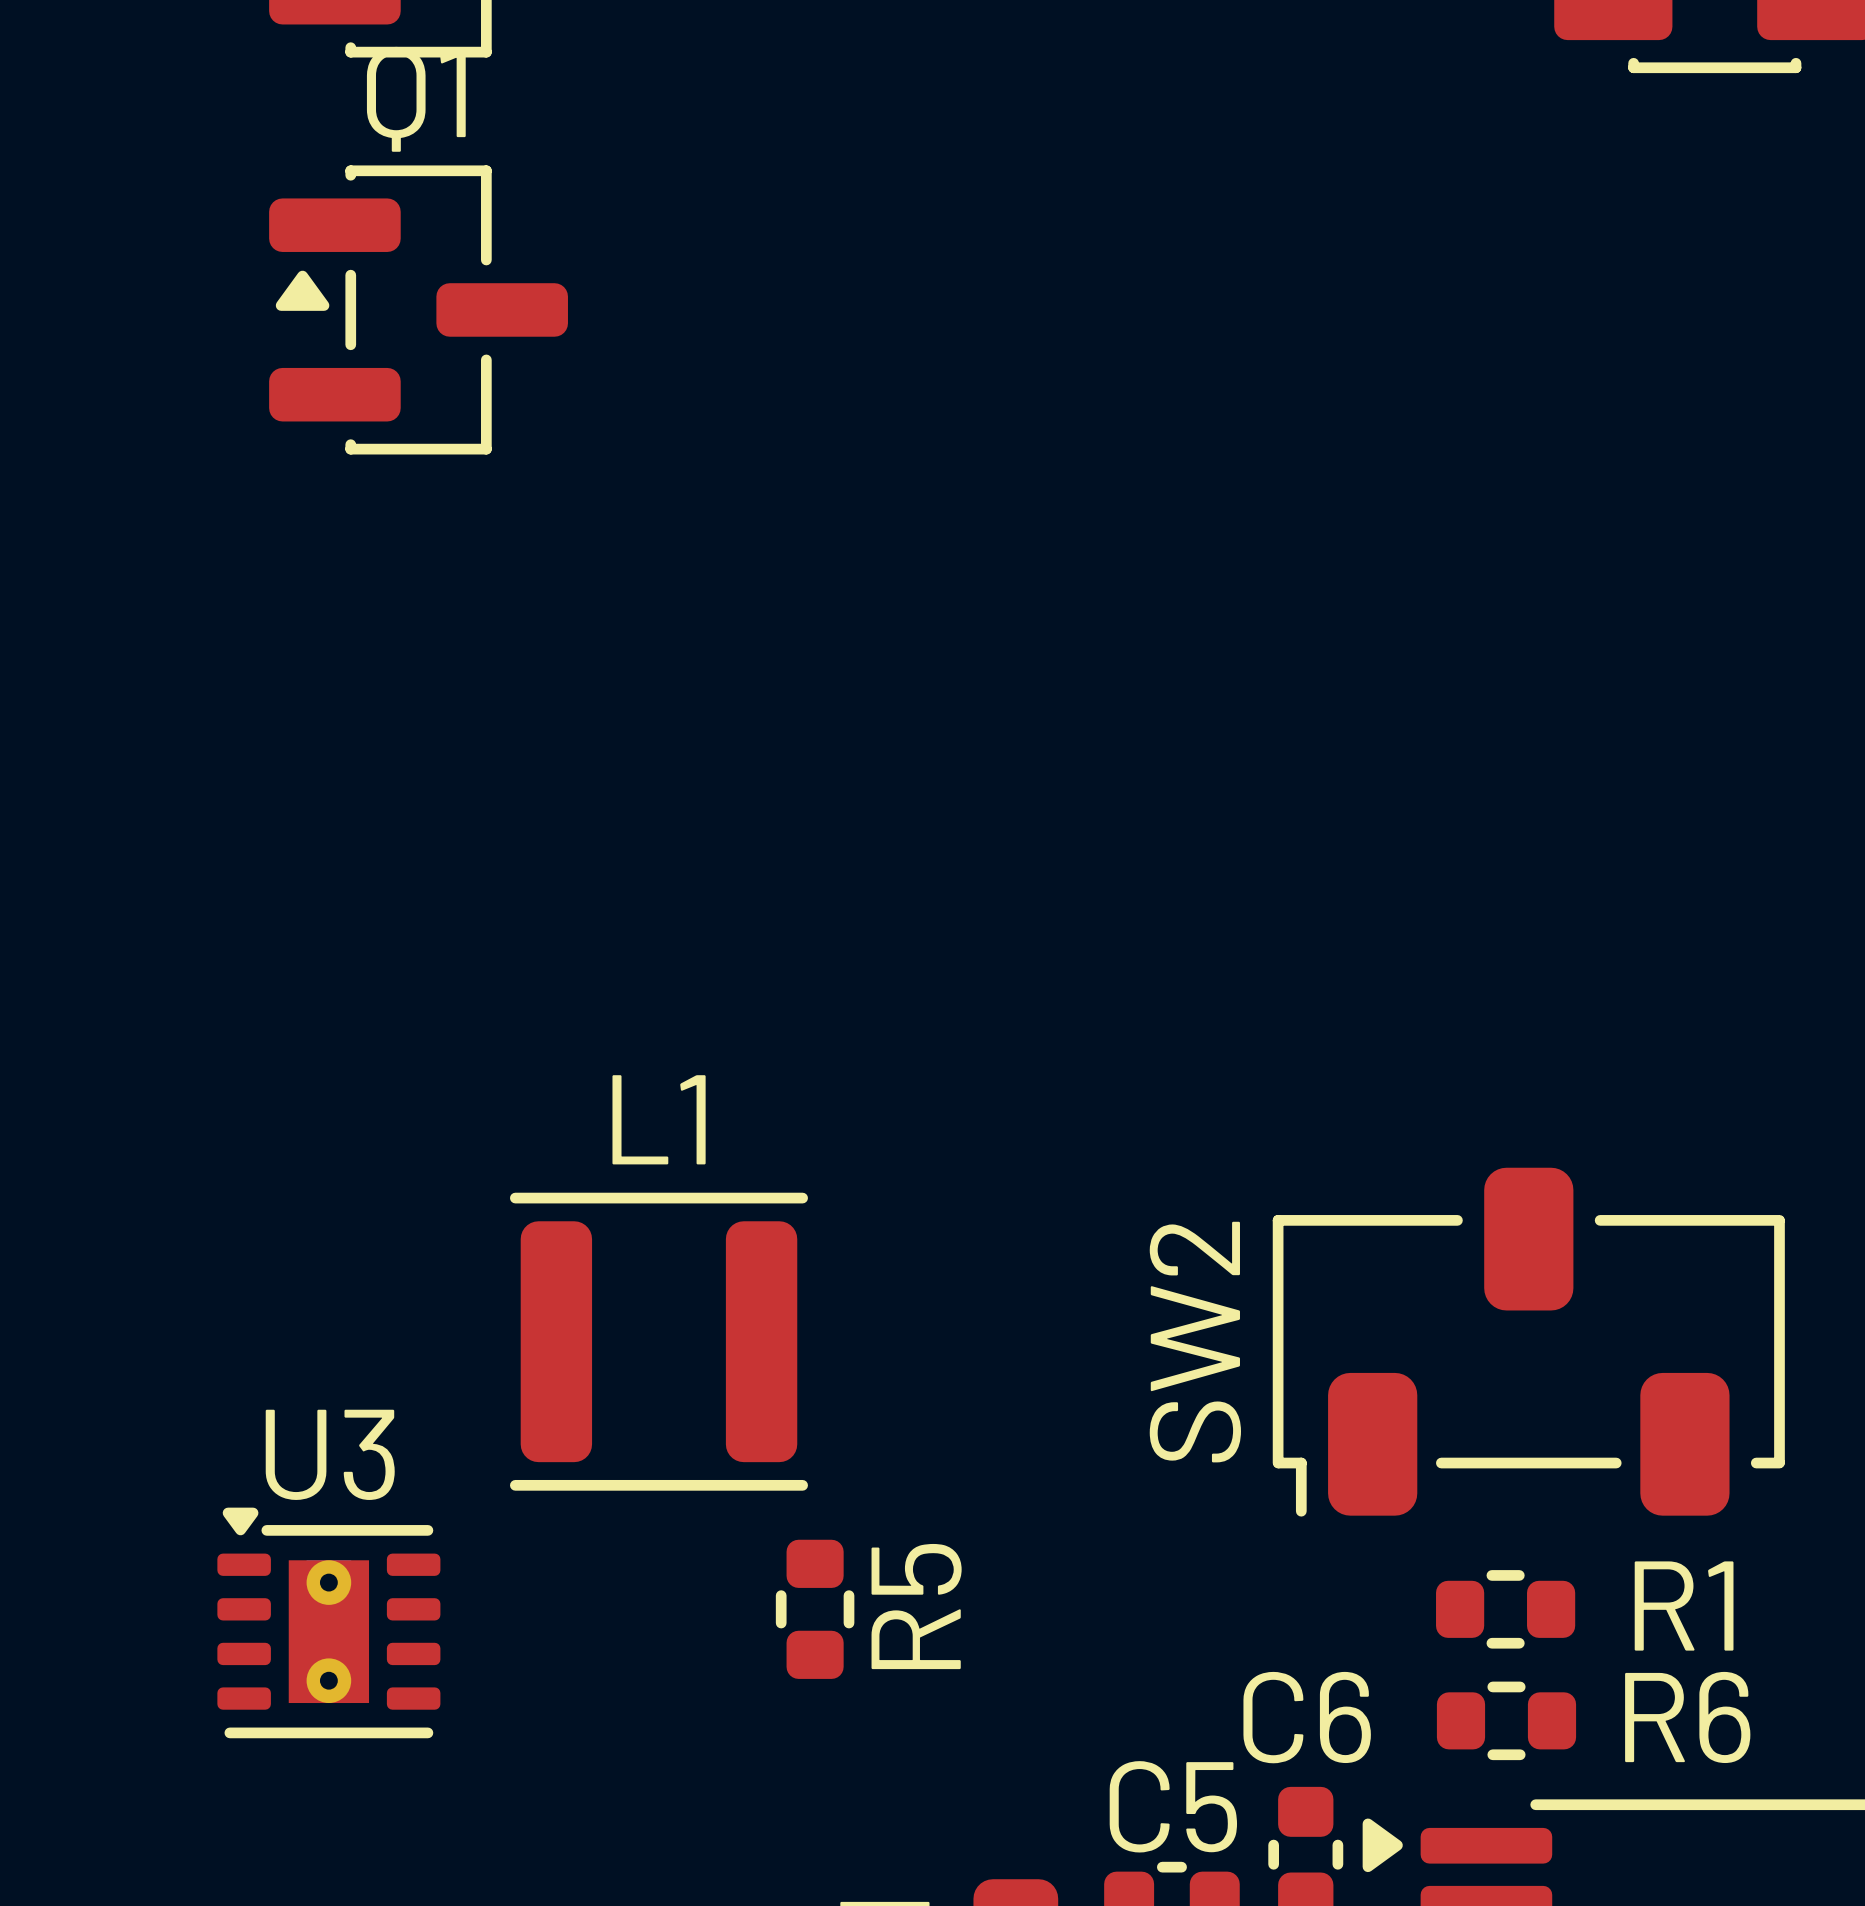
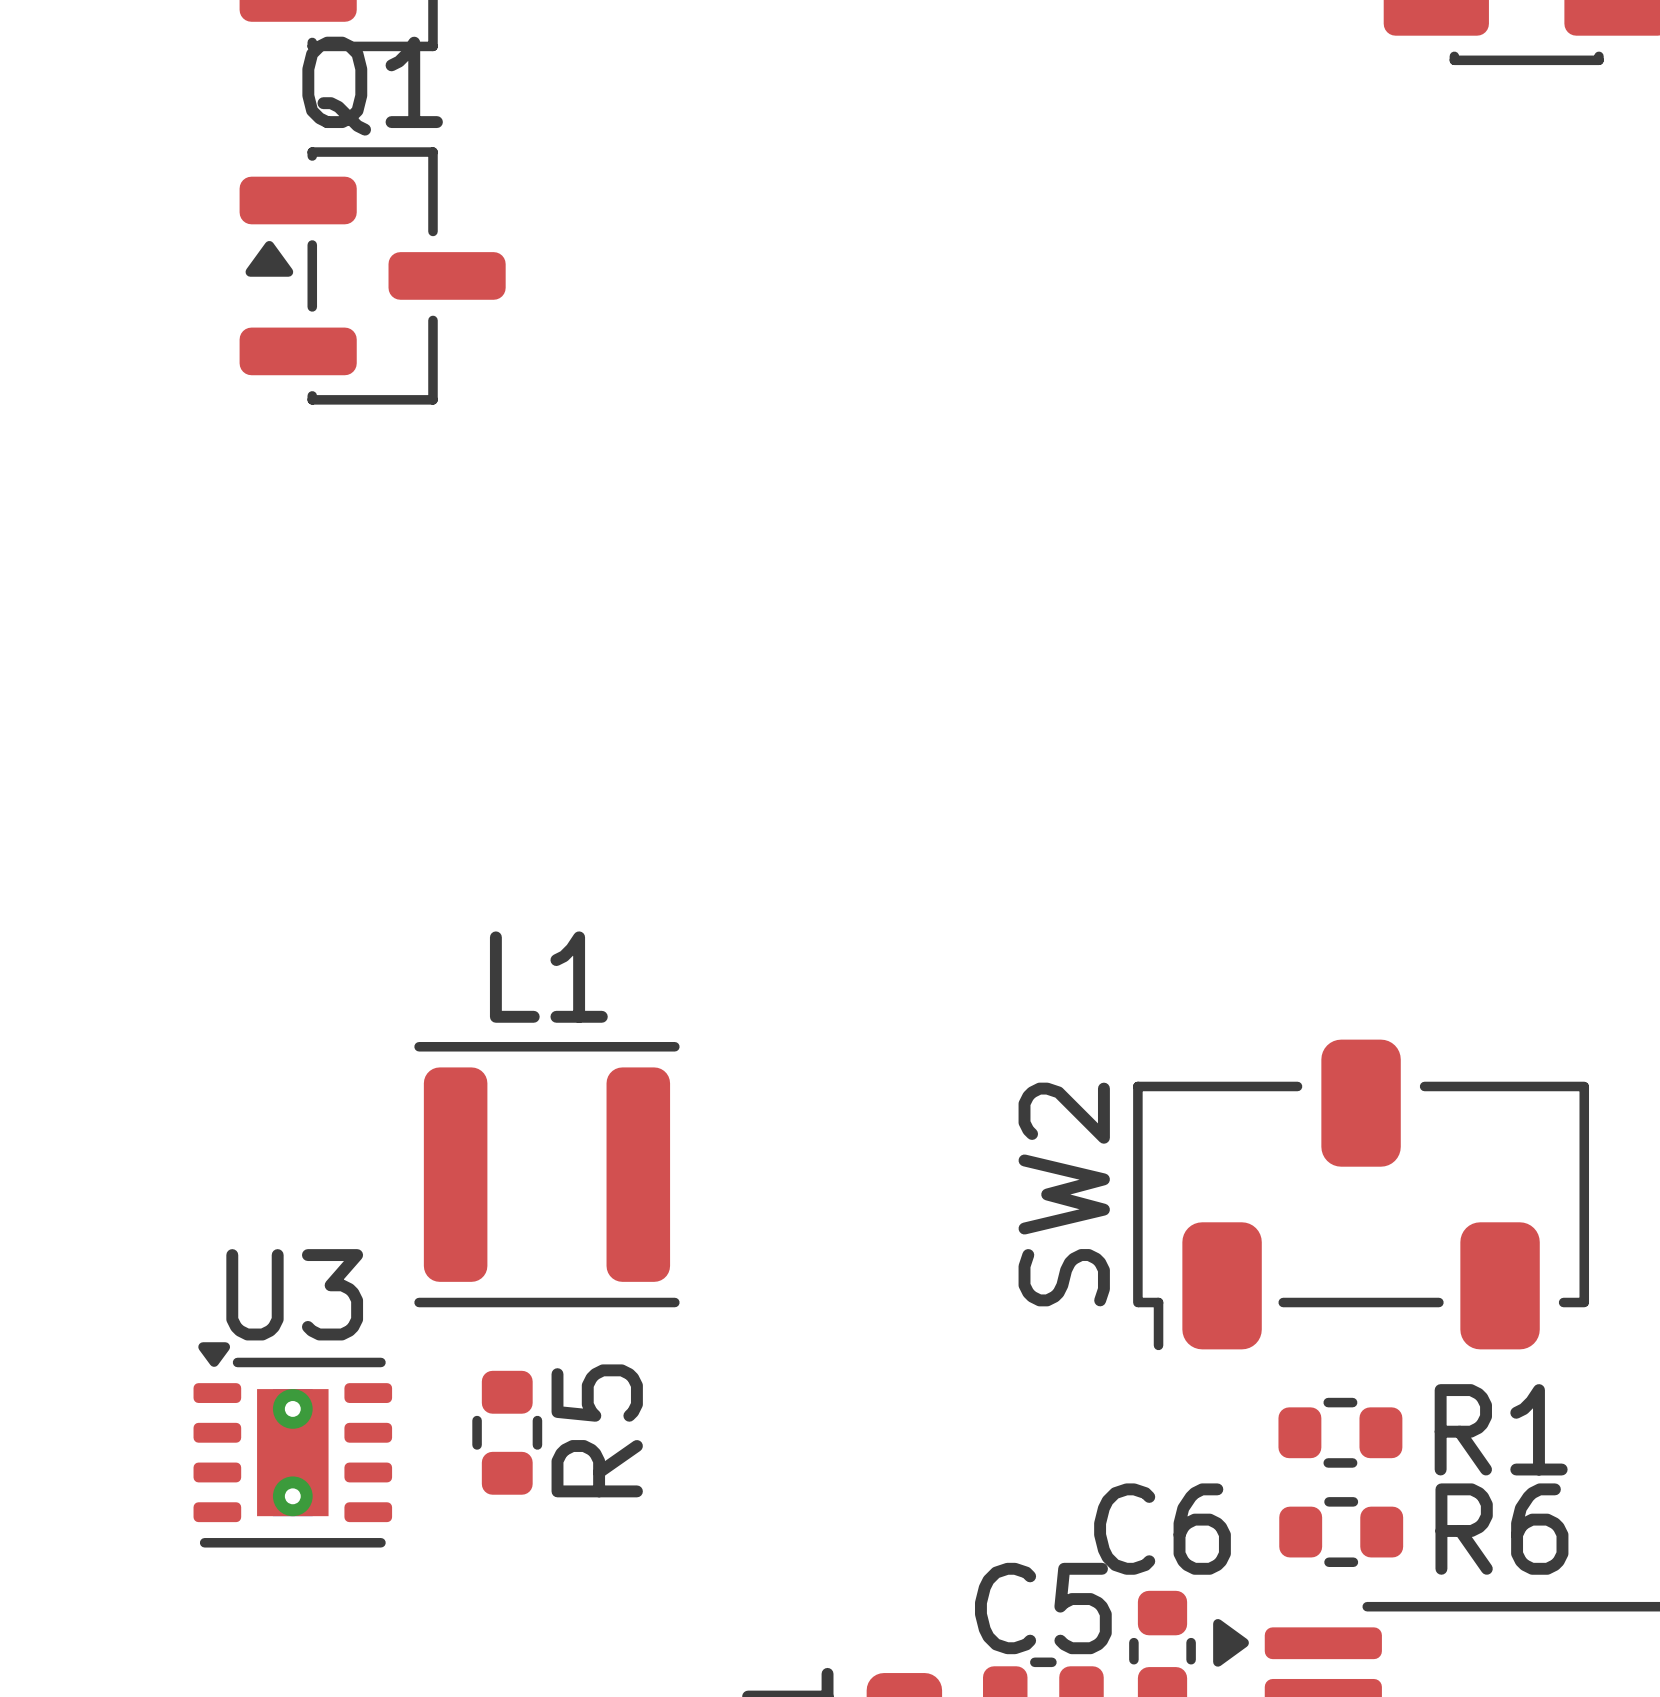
L1 position: (658, 1341) -> (546, 1174)
R5 position: (815, 1609) -> (507, 1432)

